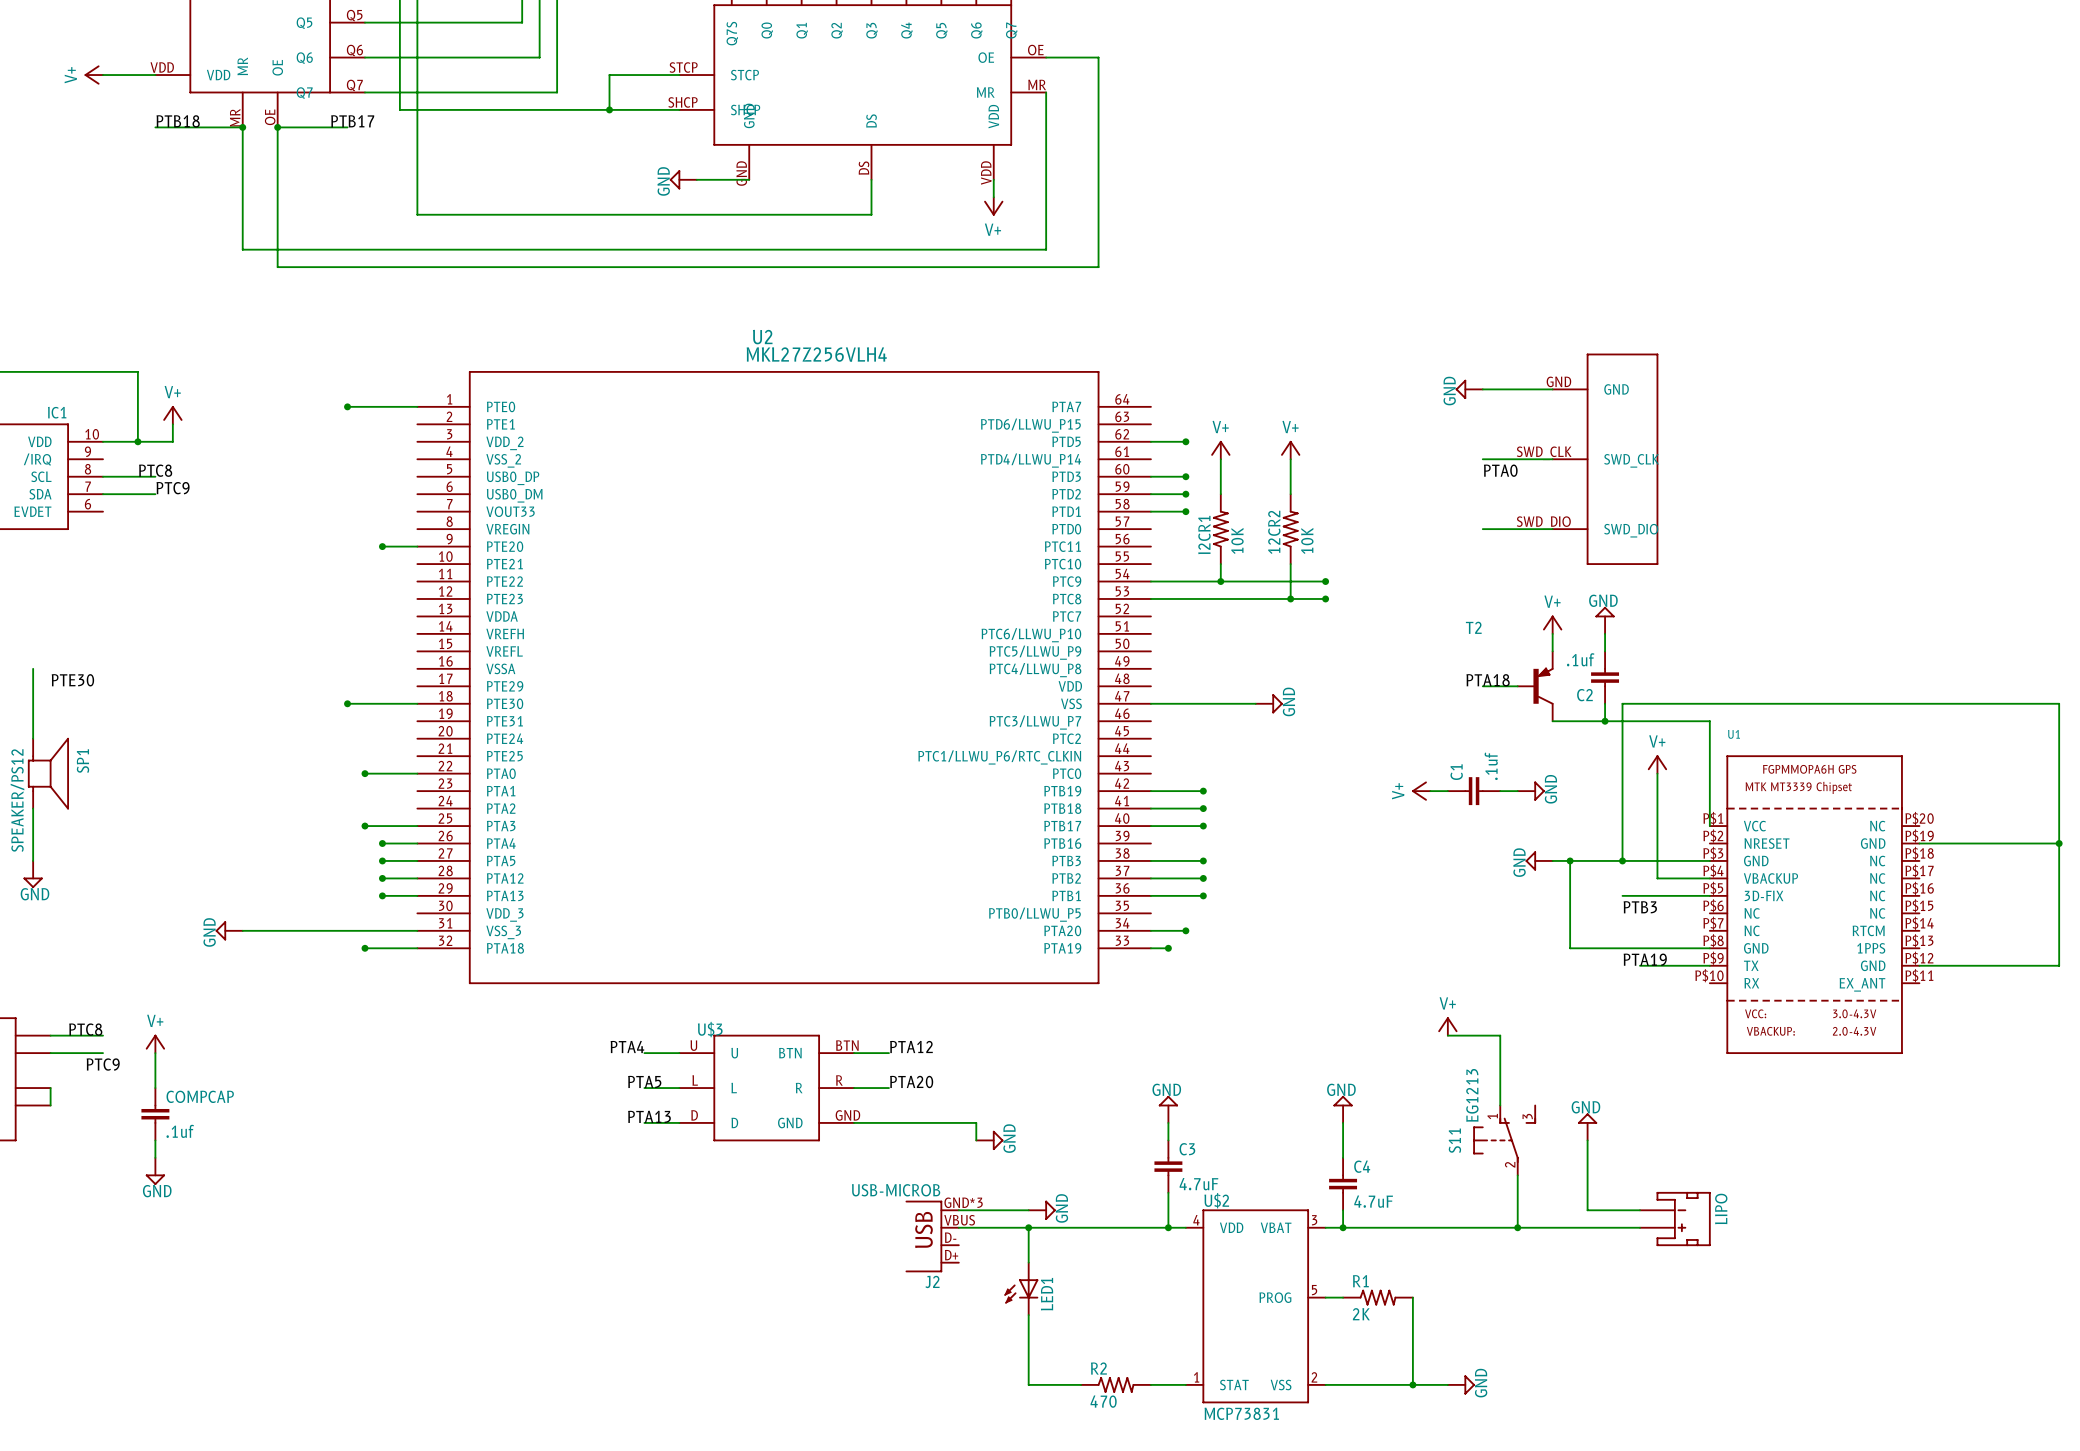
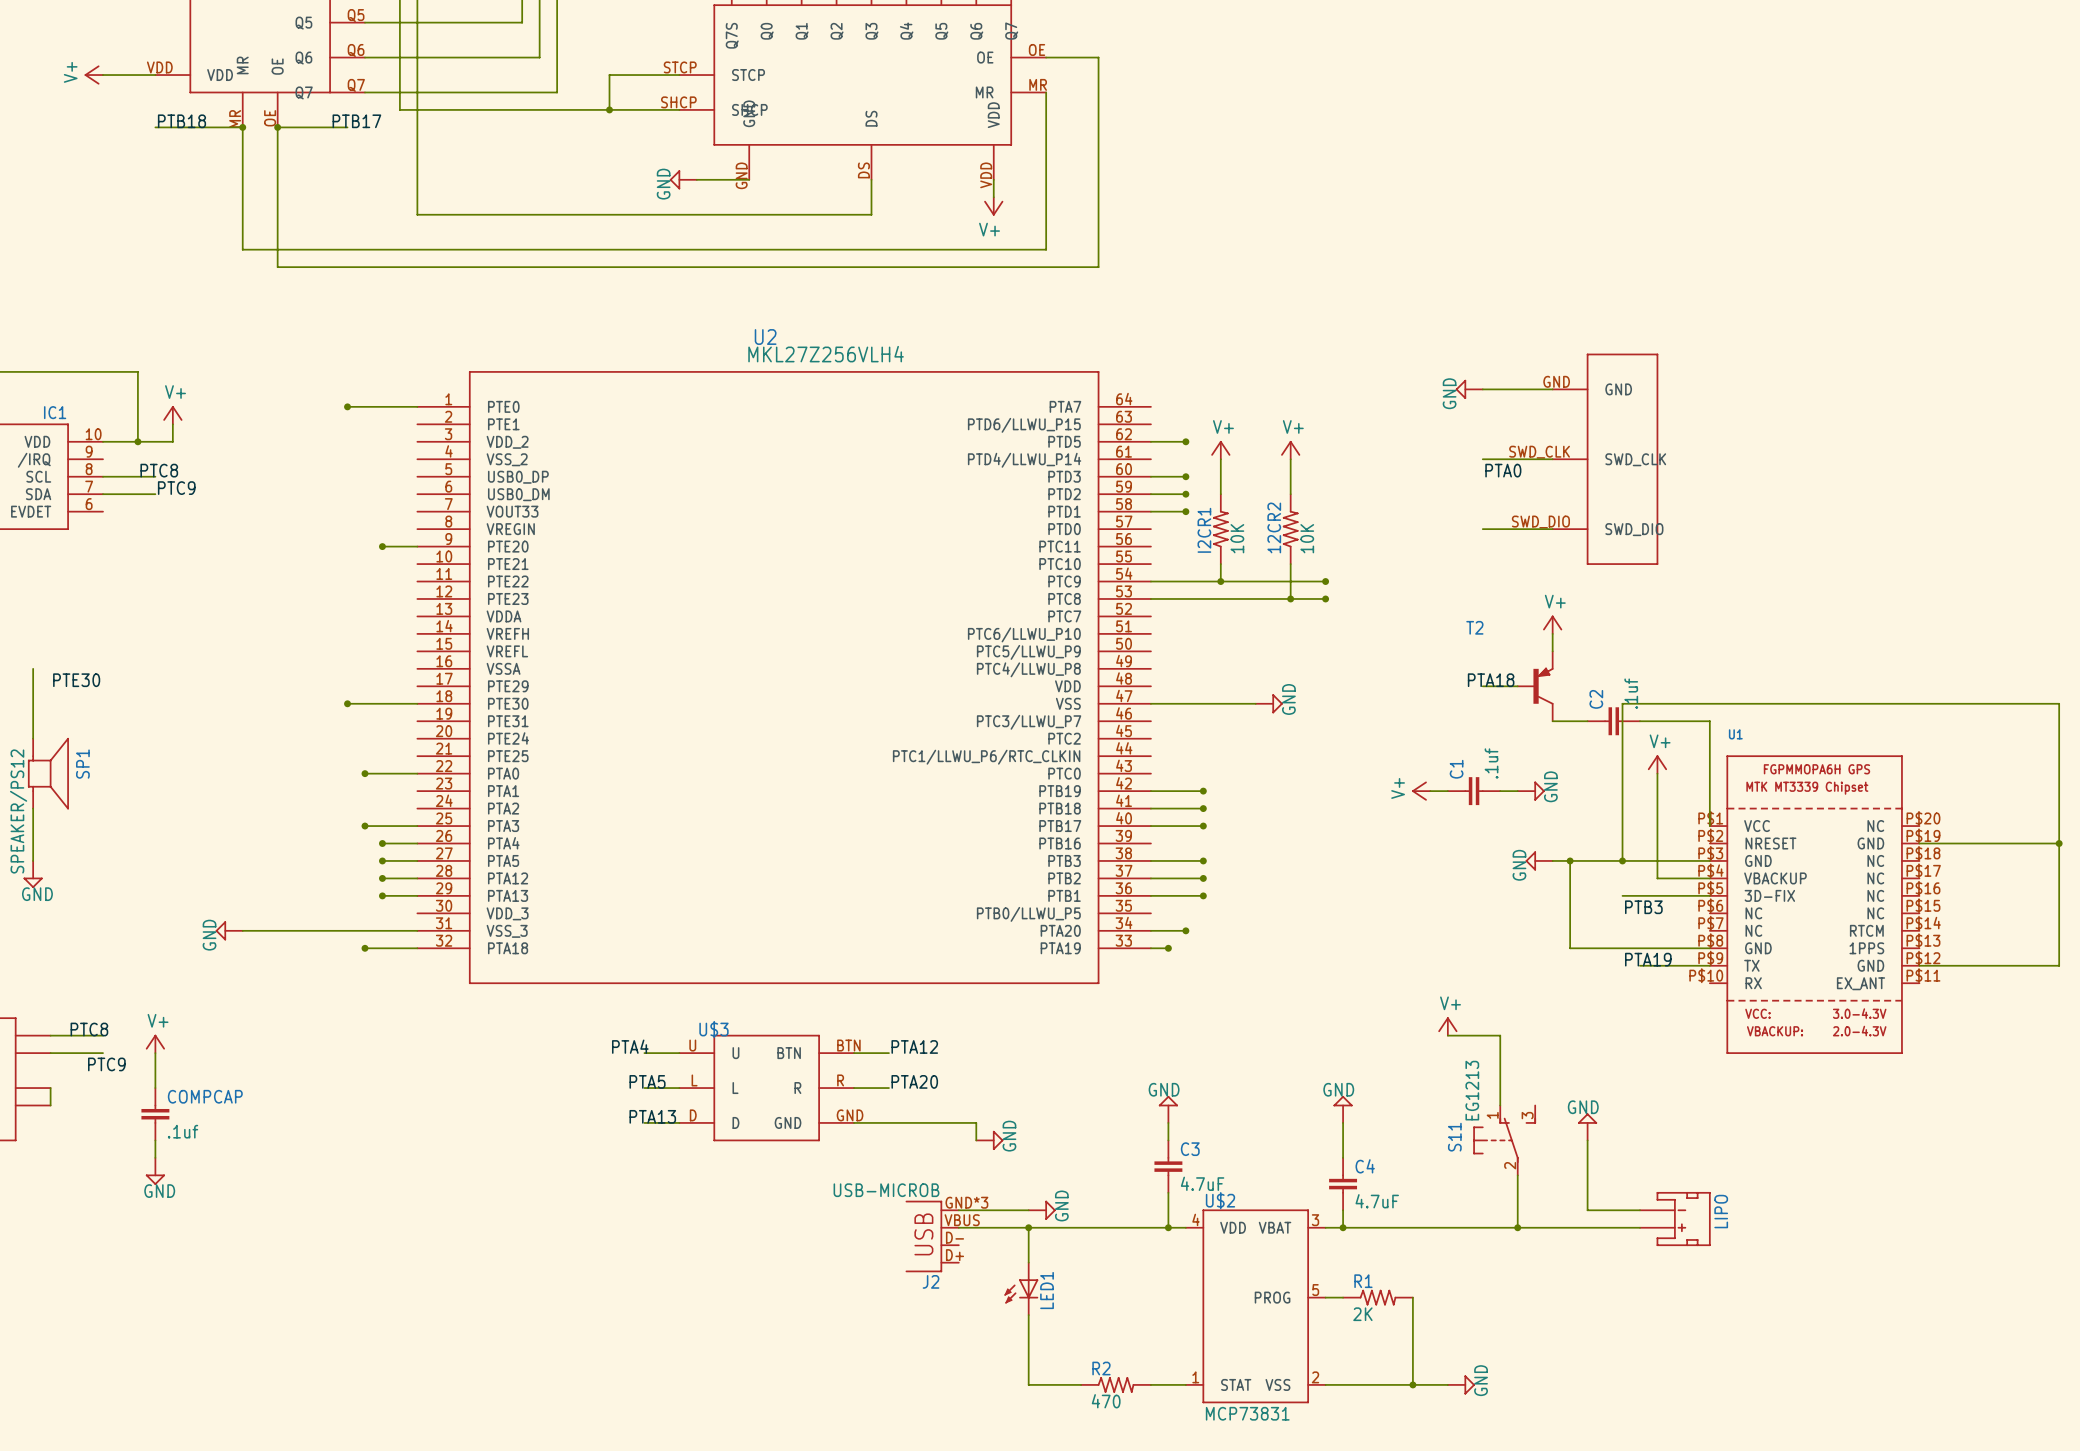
power symbol: GND (1605, 620) -> none
wire: (1605, 633) (1605, 651) -> none
C2 rotation: 0° (1605, 677) -> 90° clockwise (1613, 721)
C2 position: (1605, 677) -> (1613, 721)
wire: (1605, 703) (1605, 721) -> none
junction: (1605, 721) -> none

